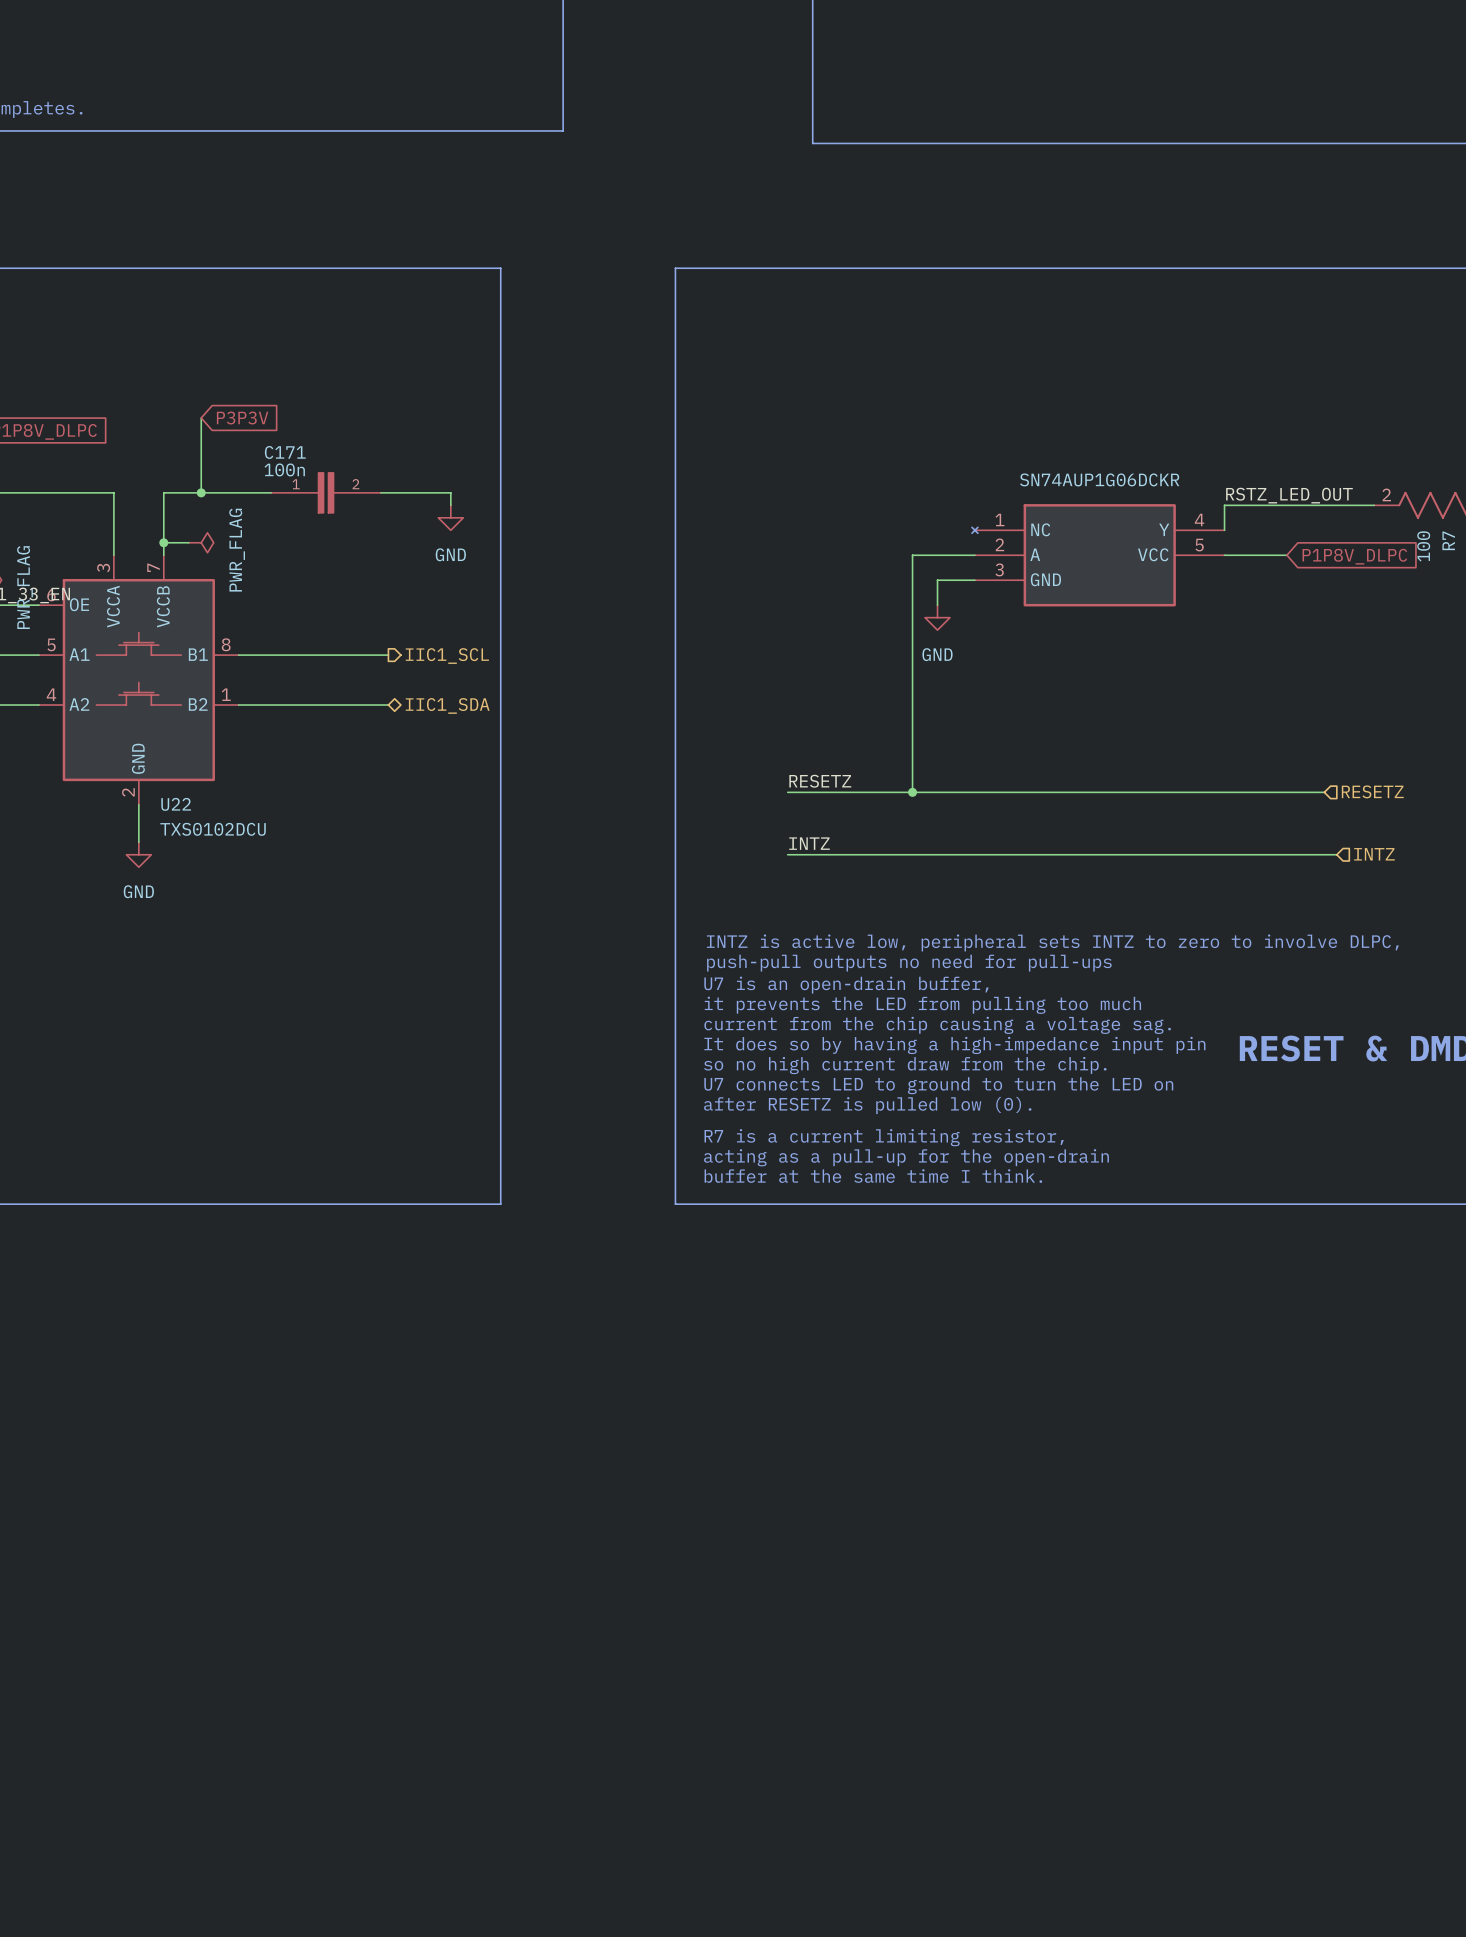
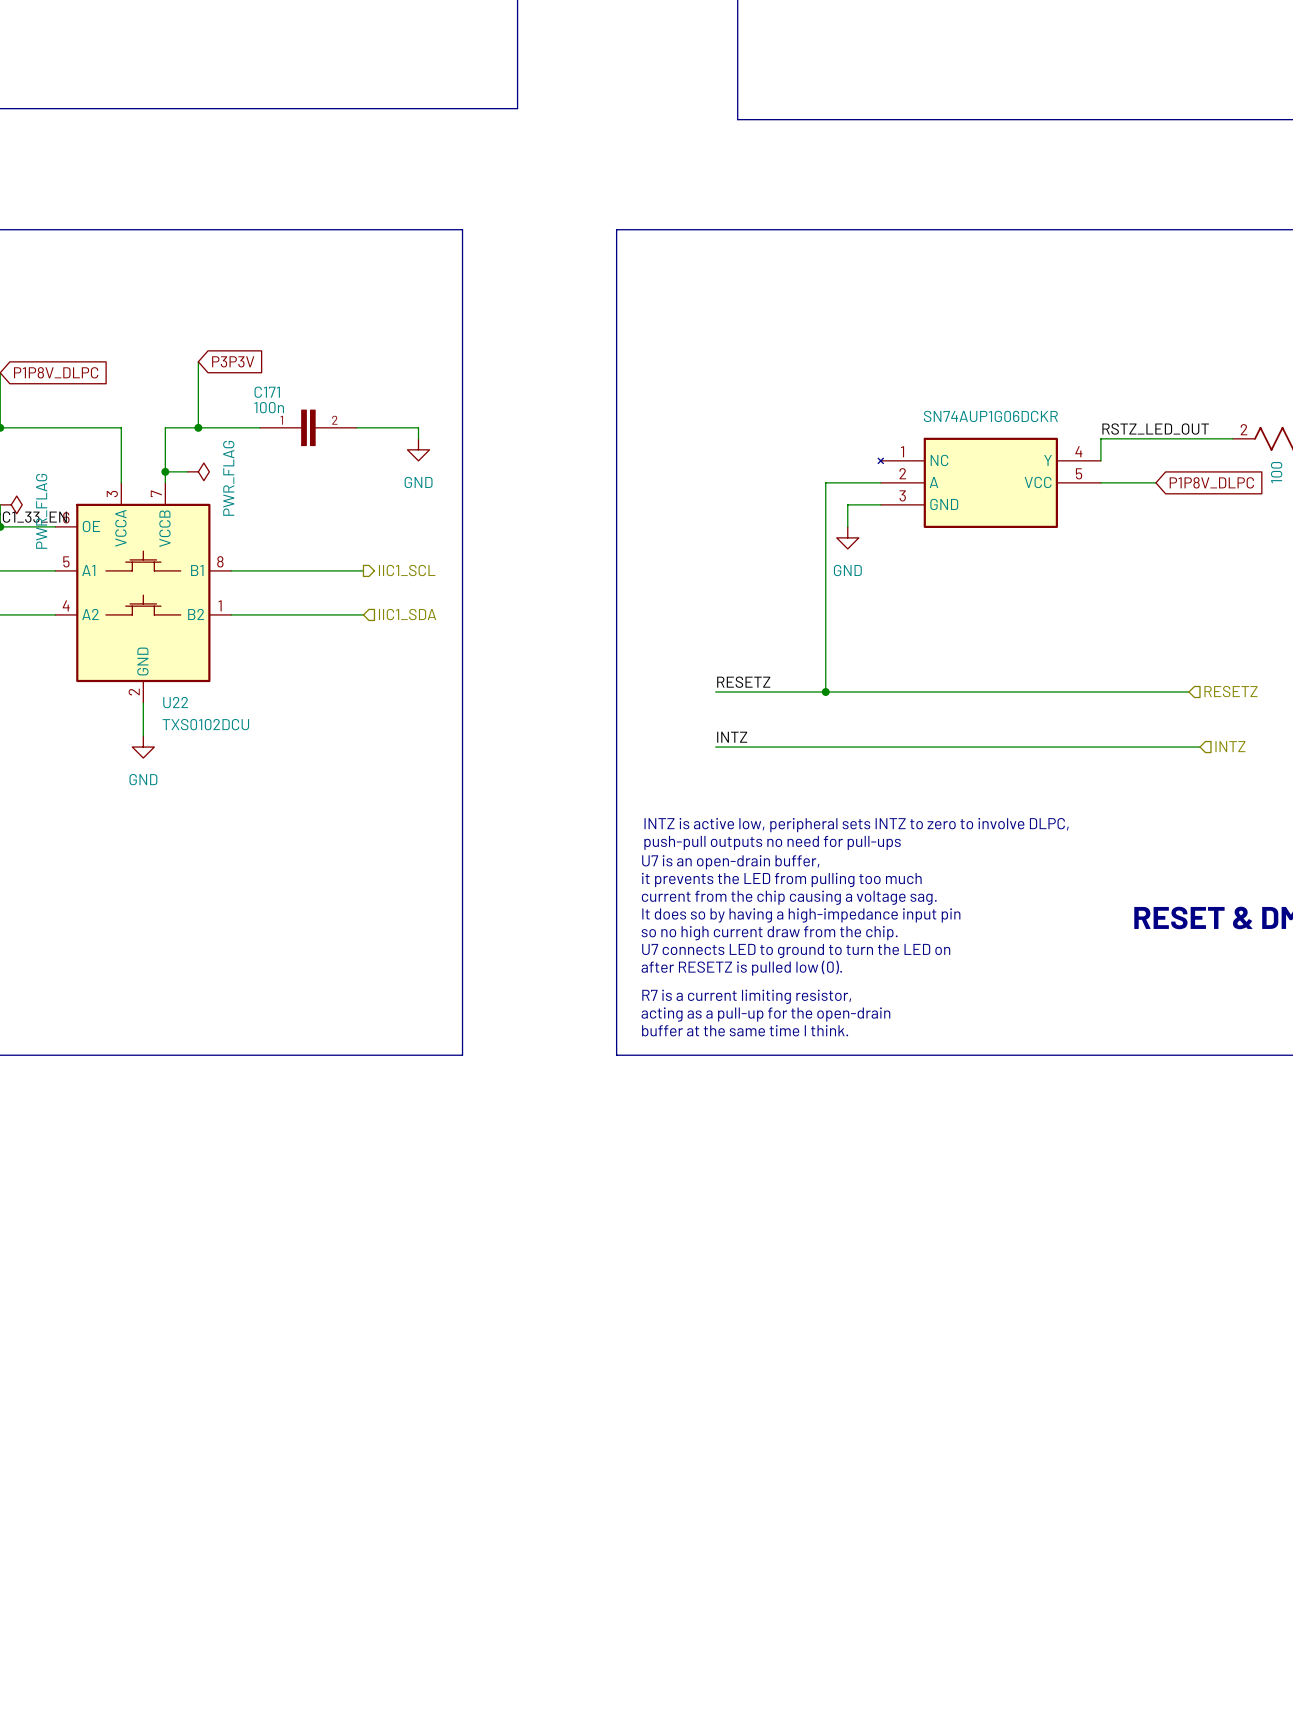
hierarchical label shape: bidirectional (447, 705) -> input (407, 614)

